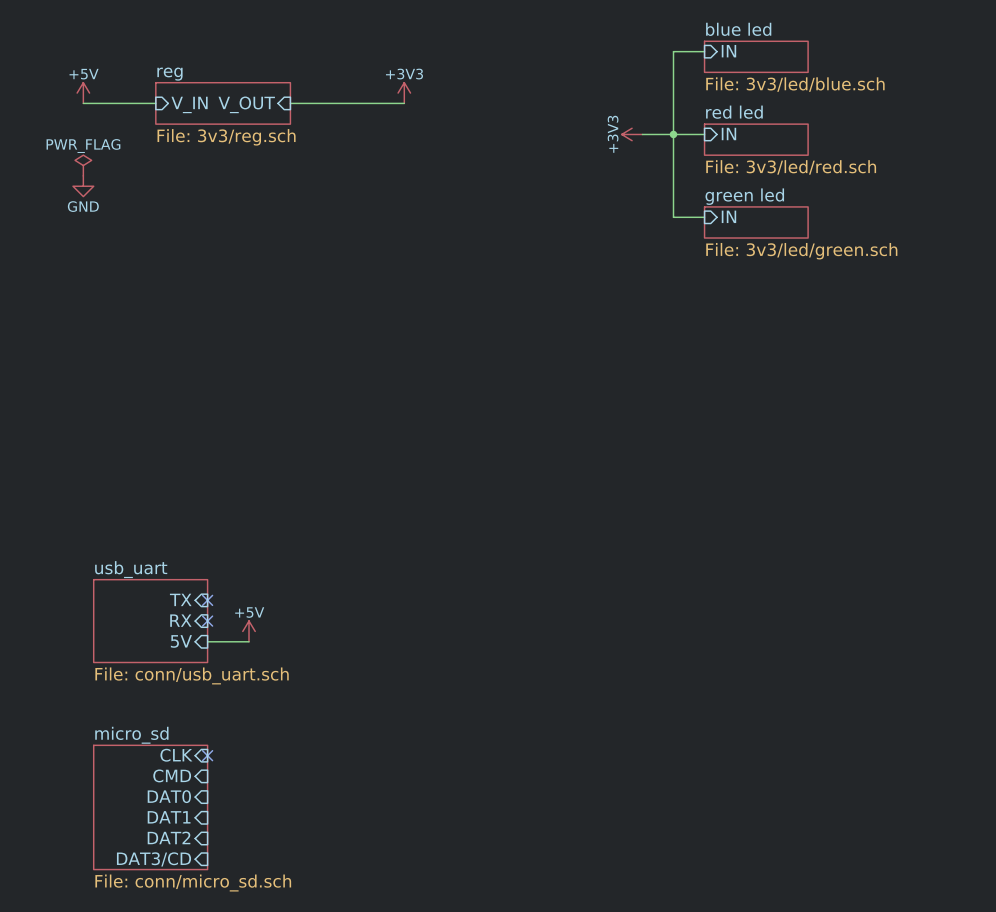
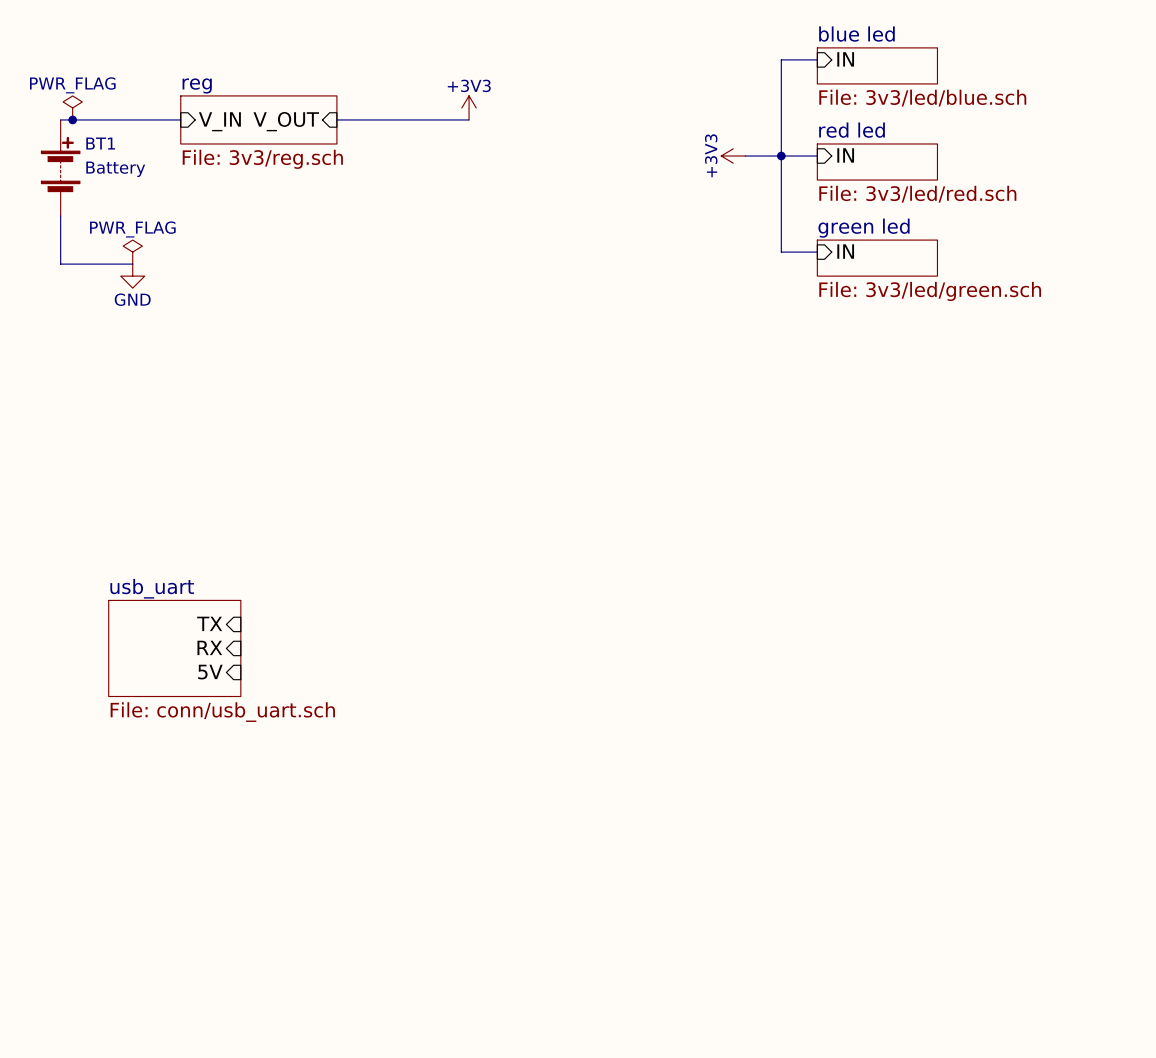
power symbol: none -> PWR_FLAG (72, 107)
power symbol: +5V (83, 93) -> none
wire: none -> (60, 119) (96, 119)
junction: none -> (72, 119)
BT1: none -> Battery (60, 168)
power symbol: PWR_FLAG (83, 165) -> none
wire: none -> (60, 216) (60, 264) (132, 264)
power symbol position: GND (83, 186) -> GND (132, 276)
power symbol: none -> PWR_FLAG (132, 252)
sheet pin position: TX (180, 599) -> TX (209, 623)
no-connect mark: (207, 600) -> none
sheet pin position: RX (180, 620) -> RX (209, 647)
sheet usb_uart position: (150, 621) -> (174, 648)
no-connect mark: (207, 621) -> none
power symbol: +5V (249, 631) -> none
sheet pin position: 5V (181, 641) -> 5V (210, 672)
wire: (207, 641) (249, 641) -> none
sheet pin: CLK (176, 755) -> none
no-connect mark: (207, 755) -> none
sheet pin: CMD (172, 775) -> none
sheet pin: DAT0 (169, 796) -> none
sheet micro_sd: File: conn/micro_sd.sch (150, 807) -> none
sheet pin: DAT1 (169, 817) -> none
sheet pin: DAT2 (169, 837) -> none
sheet pin: DAT3/CD (154, 859) -> none

